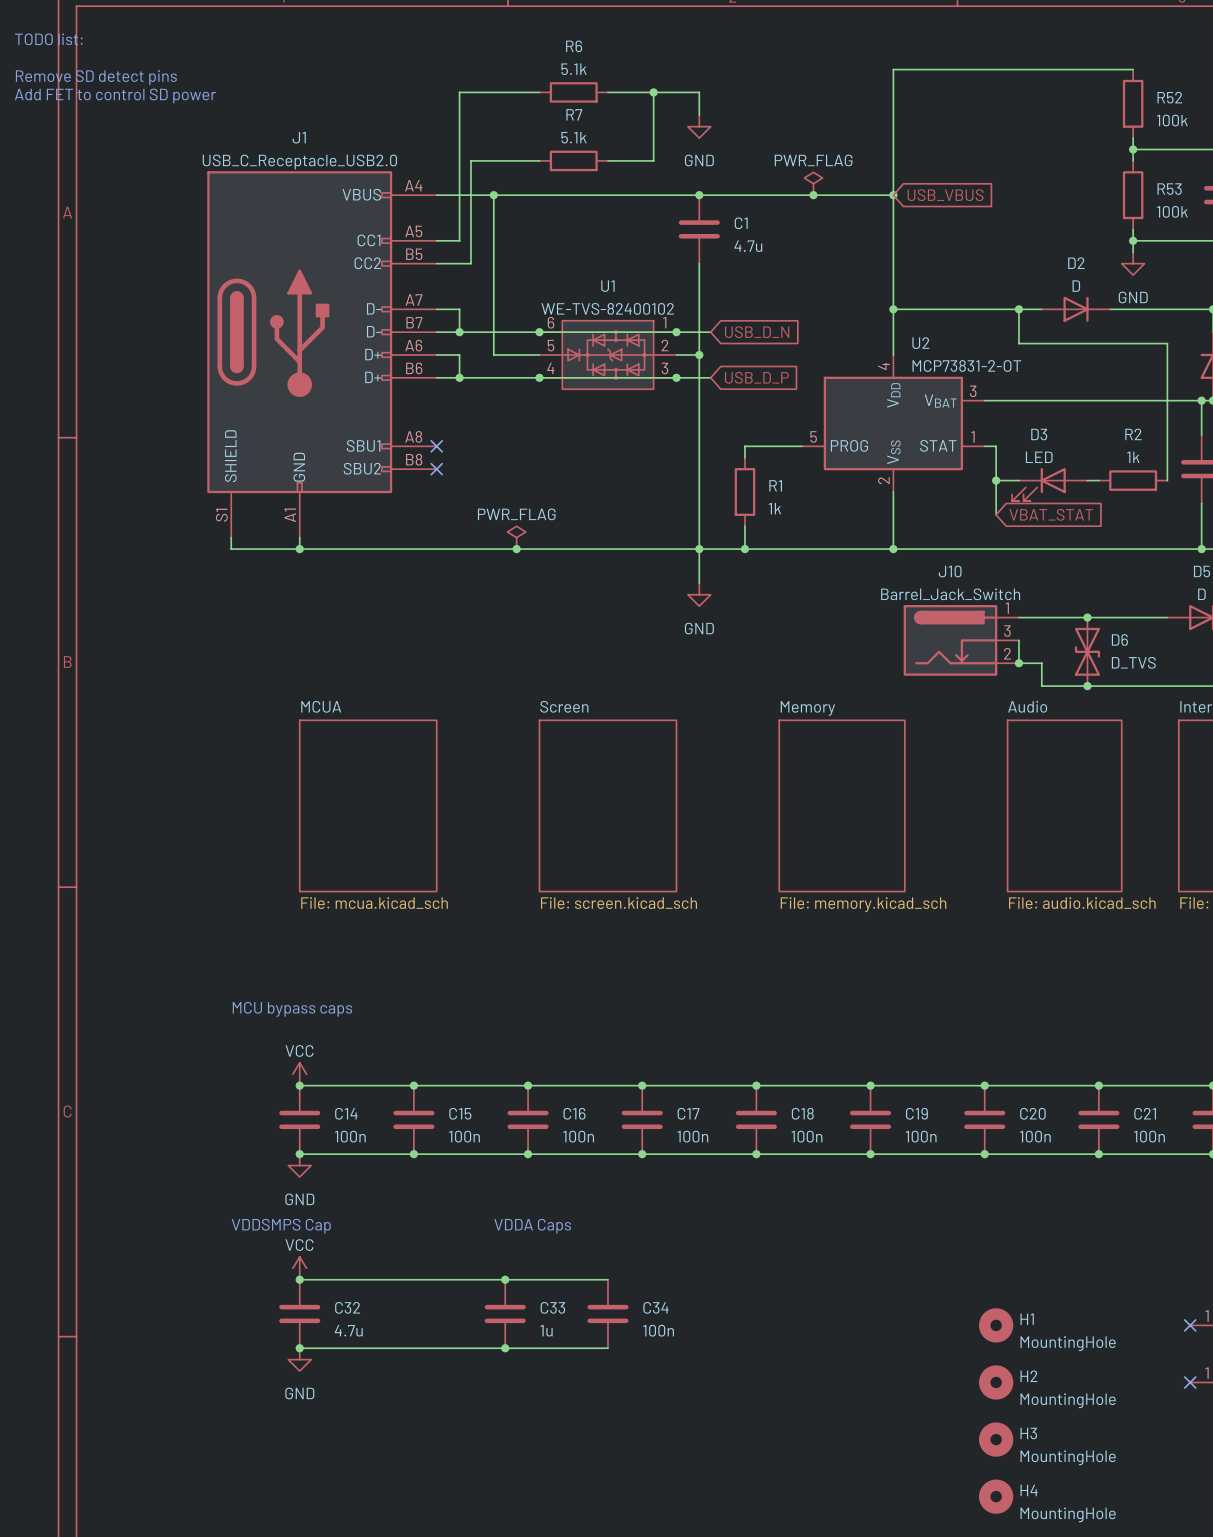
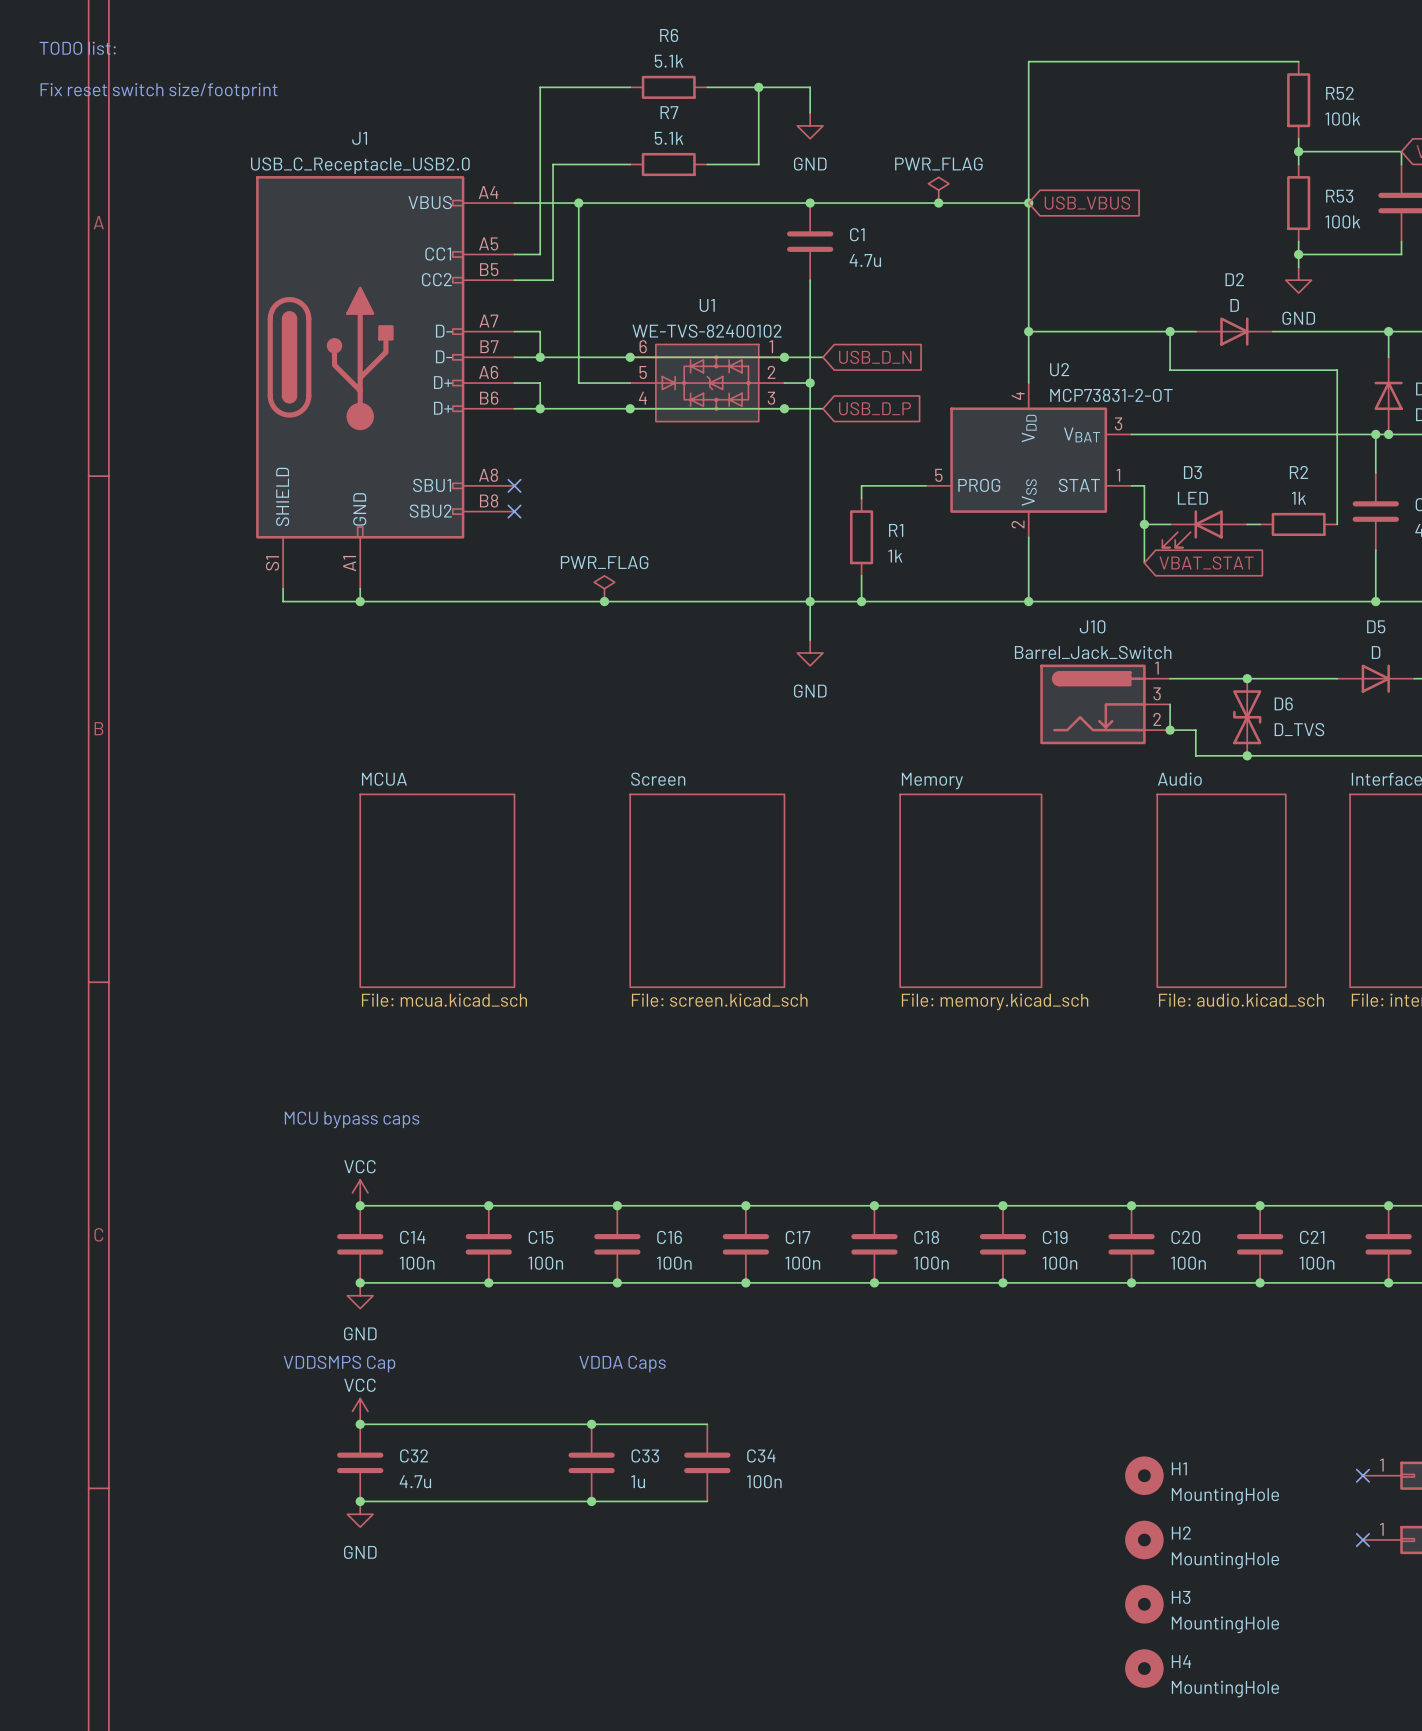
text position: TODO list: (48, 39) -> TODO list: (77, 48)
text: Remove SD detect pins (96, 77) -> none
text: Add FET to control SD power (115, 95) -> Fix reset switch size/footprint (159, 91)

